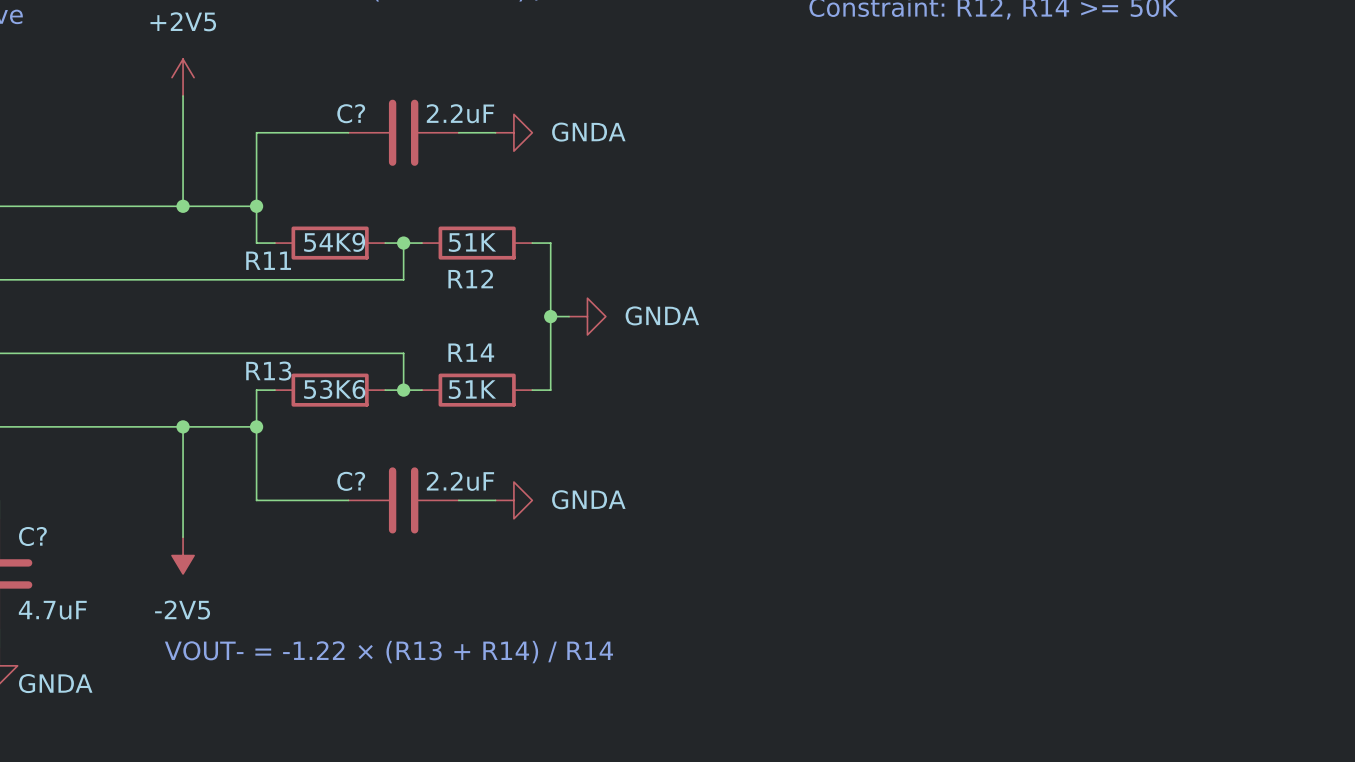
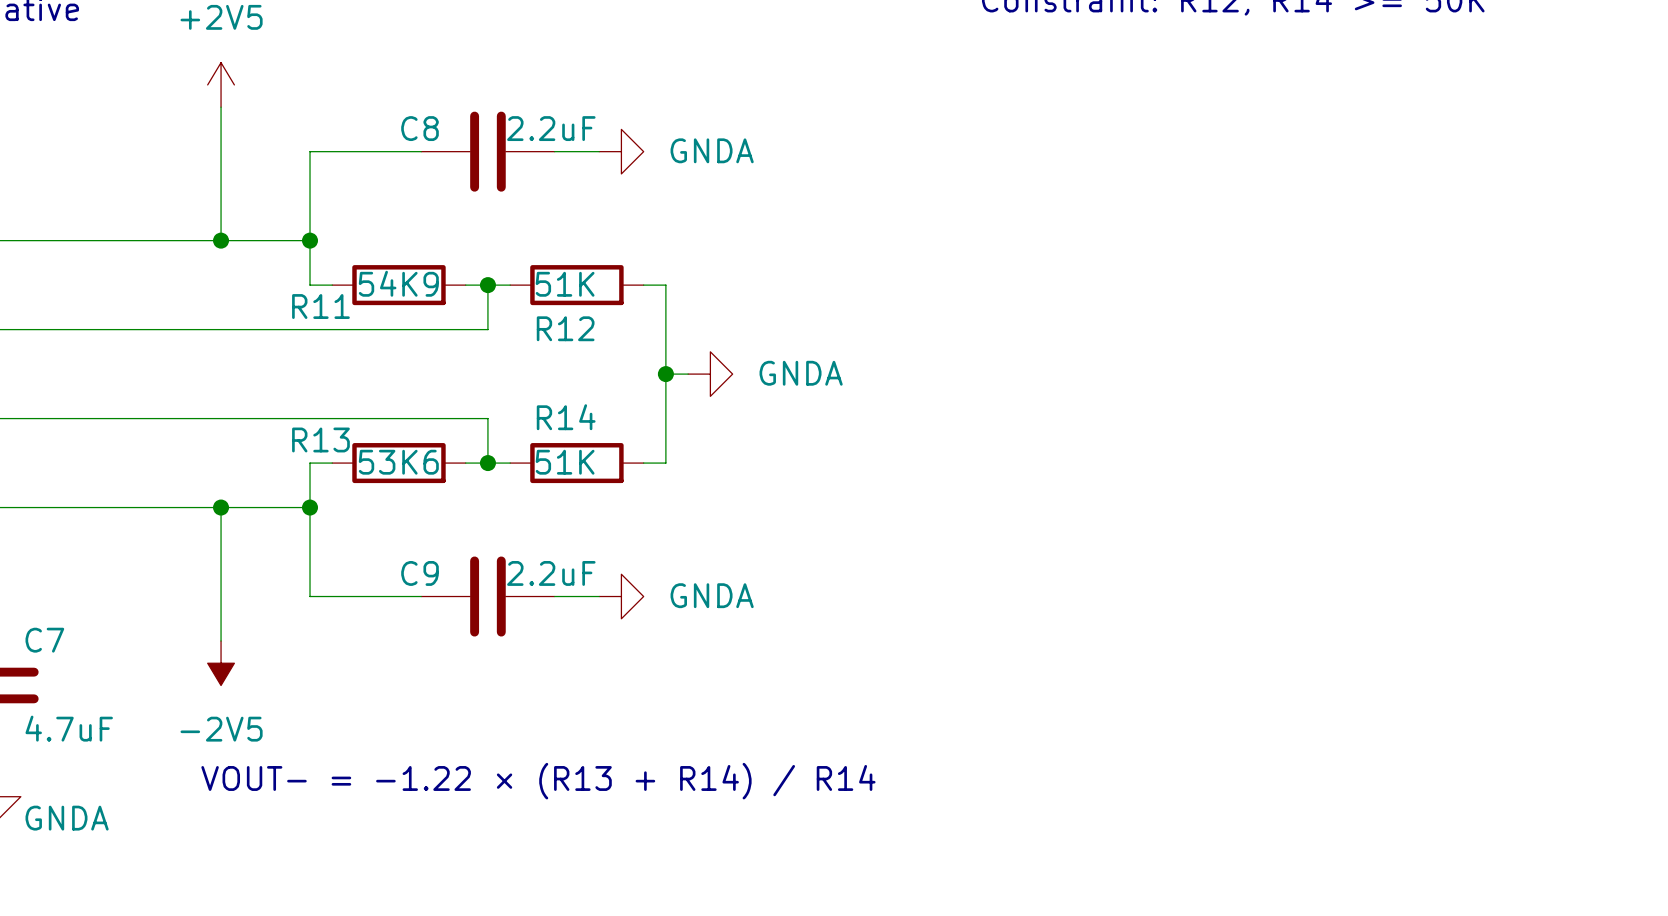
C? name: C? (351, 113) -> C8 (419, 128)
C? name: C? (351, 481) -> C9 (419, 573)
C? name: C? (32, 536) -> C7 (44, 640)

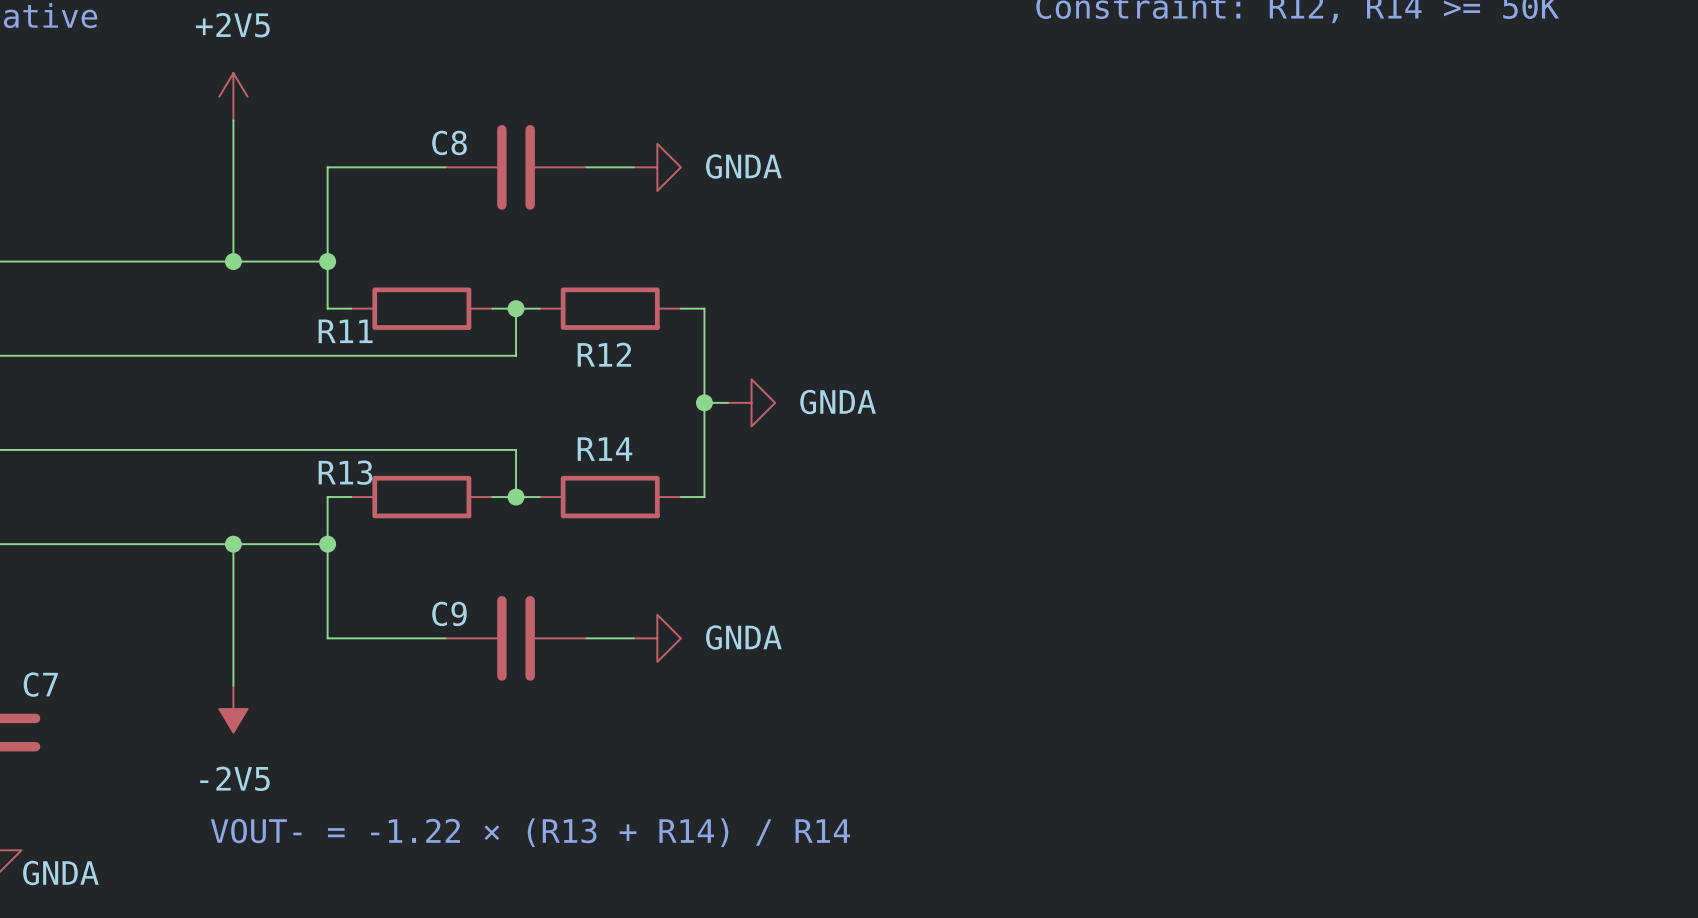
C8 value: 2.2uF (551, 128) -> none
R11 value: 54K9 (398, 283) -> none
R12 value: 51K (565, 284) -> none
R13 value: 53K6 (398, 462) -> none
R14 value: 51K (565, 462) -> none
C9 value: 2.2uF (551, 573) -> none
C7 value: 4.7uF (69, 728) -> none

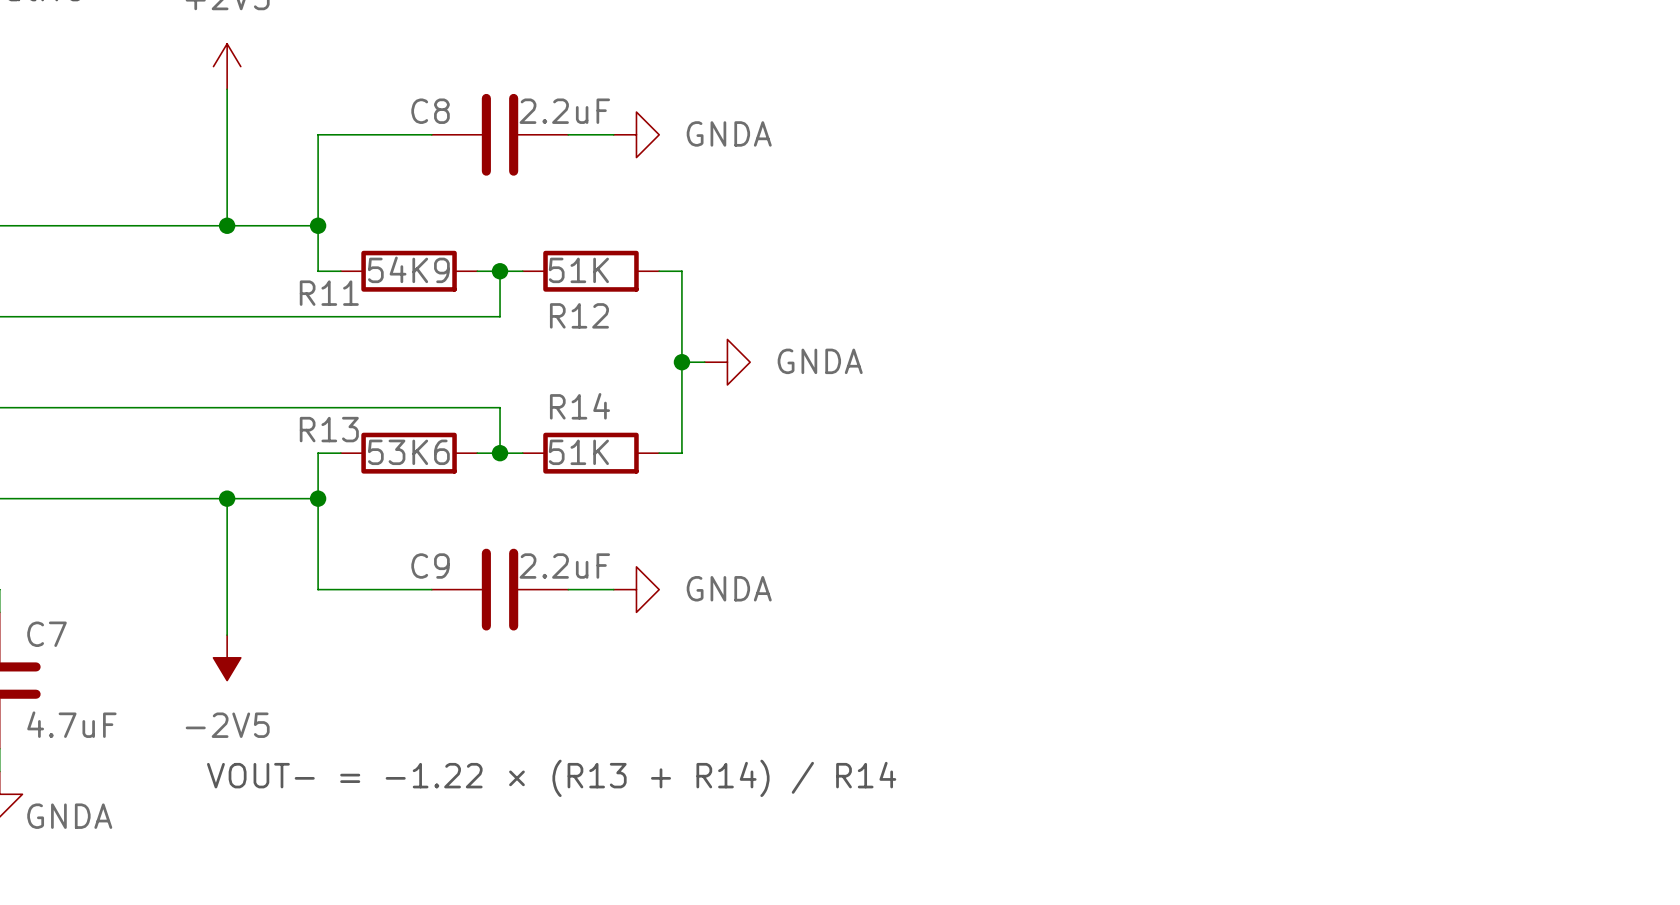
C8 value: none -> 2.2uF (564, 111)
R11 value: none -> 54K9 (408, 269)
R12 value: none -> 51K (578, 270)
R13 value: none -> 53K6 (408, 452)
R14 value: none -> 51K (578, 452)
C9 value: none -> 2.2uF (564, 566)
C7 value: none -> 4.7uF (71, 724)

